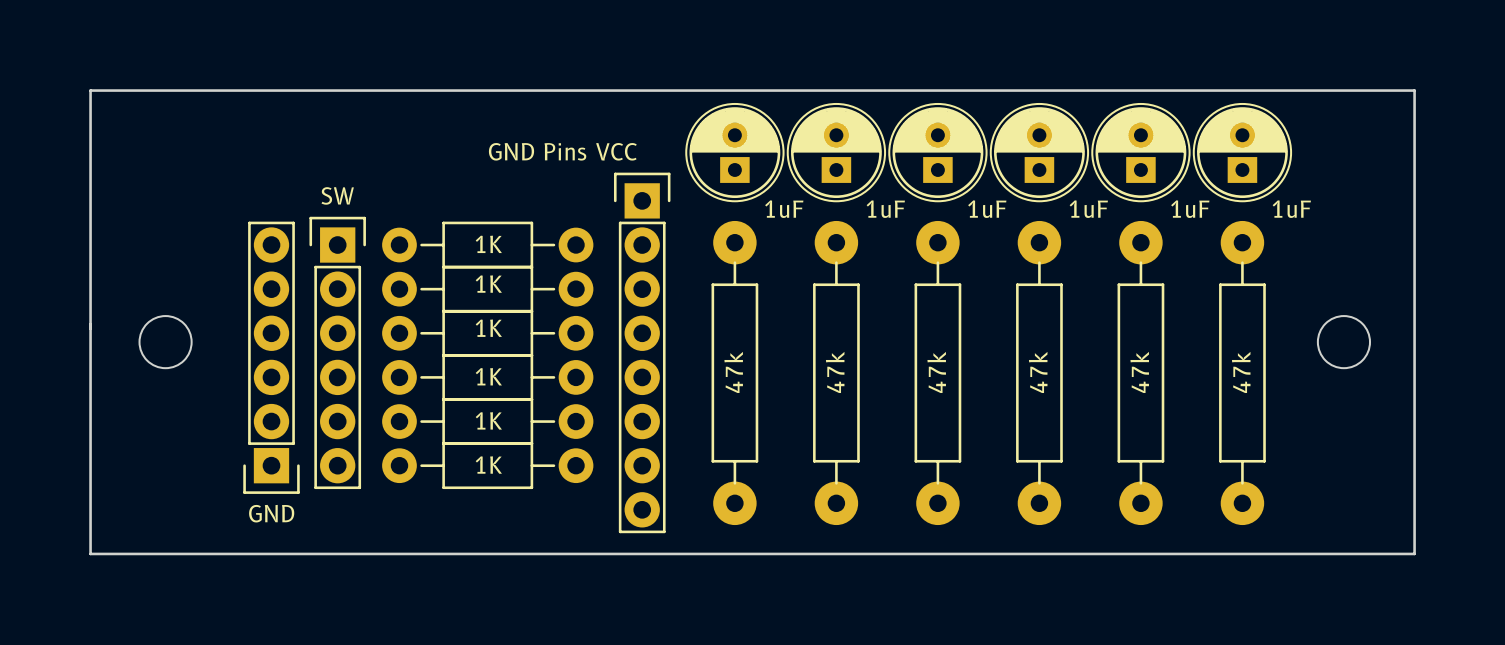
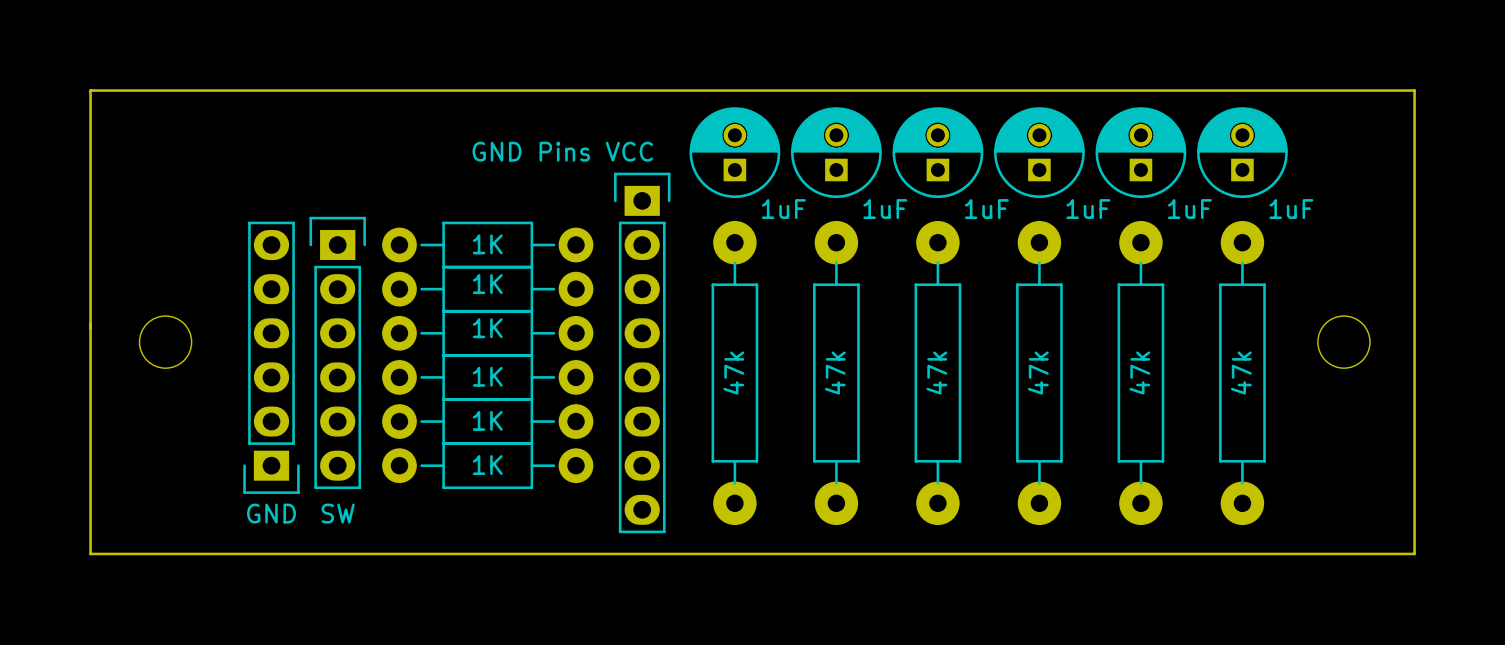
part footprint: [685, 103, 784, 202] -> [689, 107, 781, 199]
part footprint: [787, 103, 886, 202] -> [791, 107, 882, 199]
part footprint: [888, 103, 988, 202] -> [892, 107, 984, 199]
part footprint: [990, 103, 1089, 202] -> [994, 107, 1085, 199]
part footprint: [1091, 103, 1191, 202] -> [1095, 107, 1187, 199]
part footprint: [1193, 103, 1292, 202] -> [1197, 107, 1288, 199]
GND Pins VCC footprint: [613, 172, 671, 534] -> [613, 172, 671, 534]
SW name position: SW (337, 195) -> SW (338, 513)
SW footprint: [309, 216, 366, 490] -> [309, 216, 366, 490]
GND footprint: [243, 221, 300, 494] -> [243, 221, 300, 494]

